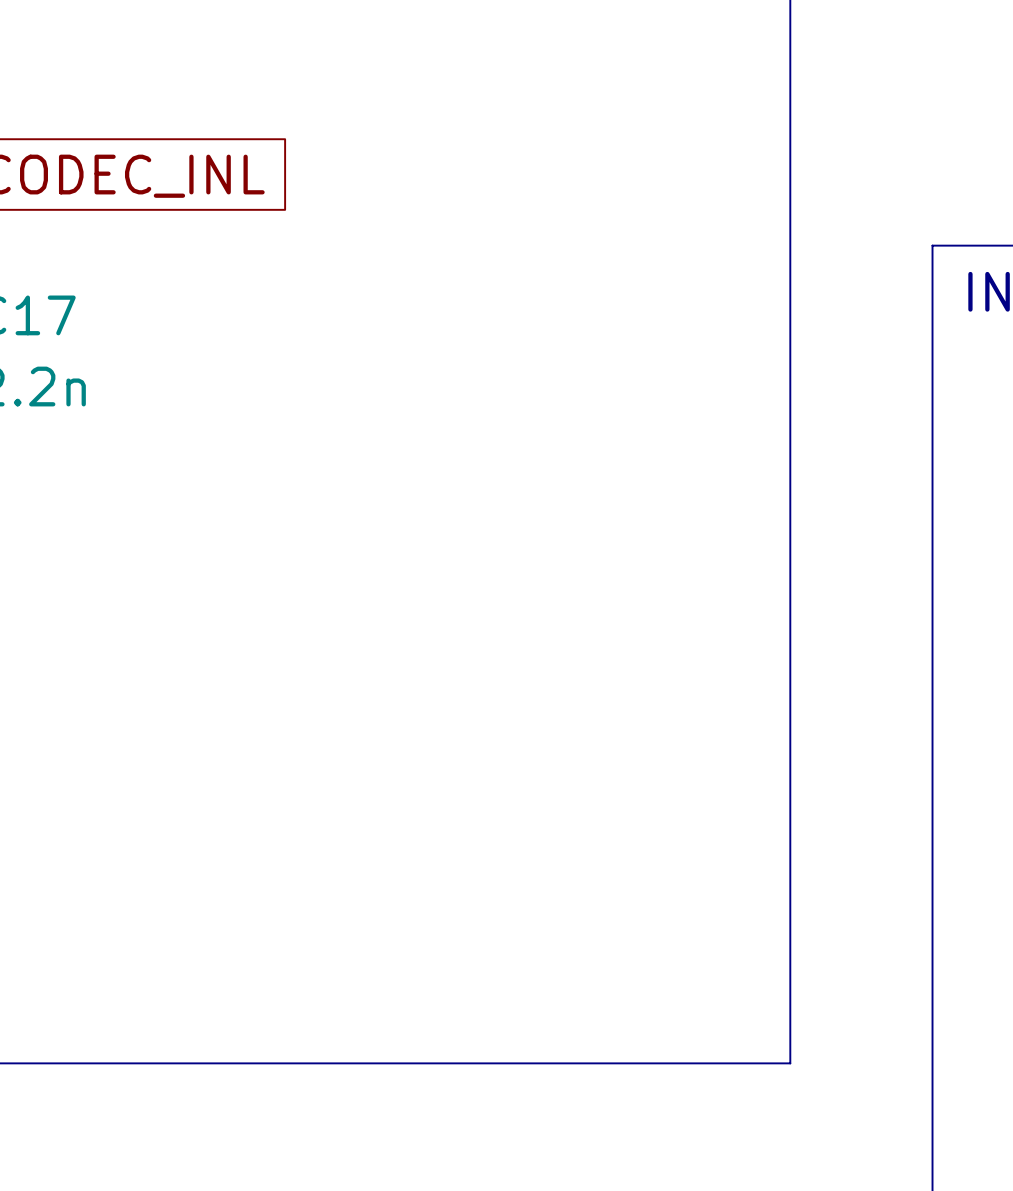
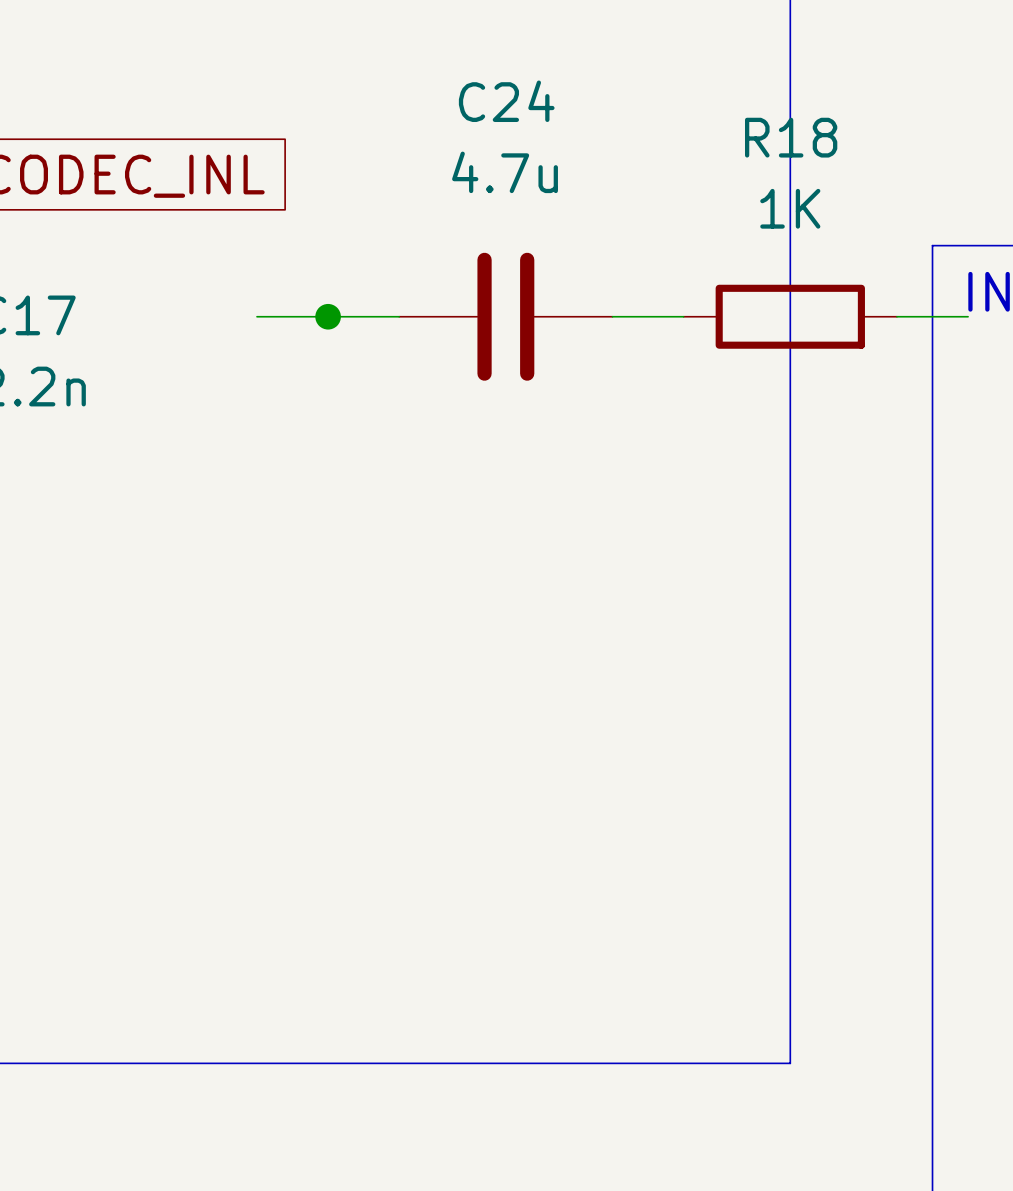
wire: none -> (257, 316) (399, 316)
junction: none -> (328, 316)
C24: none -> 4.7u (505, 316)
wire: none -> (612, 316) (683, 316)
R18: none -> 1K (790, 316)
wire: none -> (896, 316) (968, 316)

